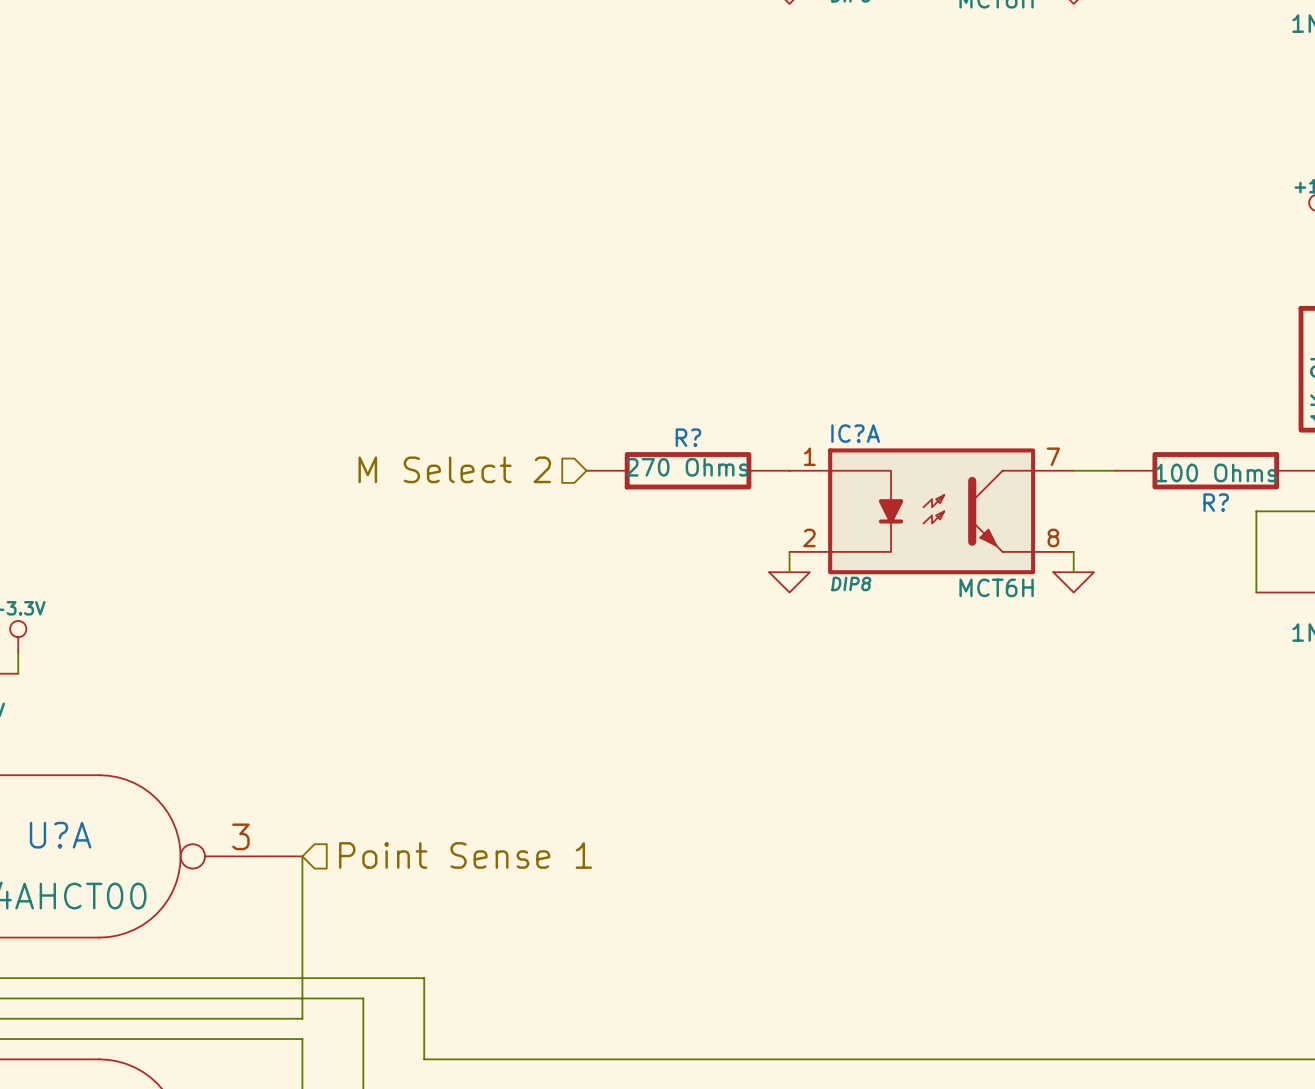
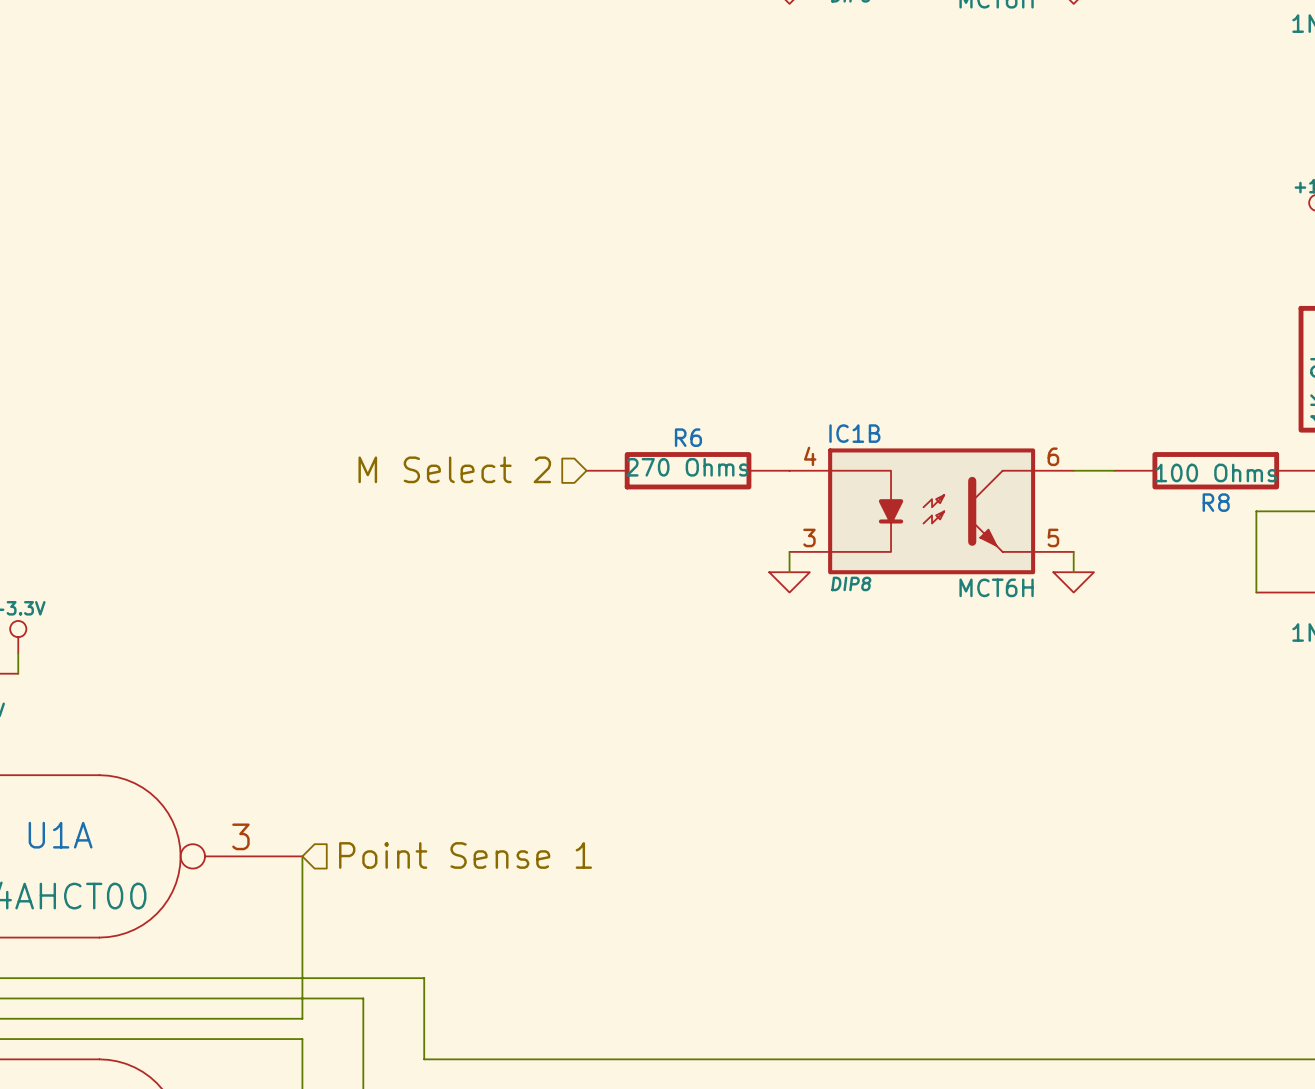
IC?A name: IC?A (855, 433) -> IC1B (854, 433)
R? name: R? (688, 437) -> R6 (688, 437)
IC?A pin number: 1 (809, 456) -> 4 (810, 456)
IC?A pin number: 7 (1053, 456) -> 6 (1053, 456)
R? name: R? (1216, 502) -> R8 (1216, 502)
IC?A pin number: 2 (809, 537) -> 3 (809, 537)
IC?A pin number: 8 (1053, 537) -> 5 (1053, 537)
U?A name: U?A (60, 835) -> U1A (60, 835)

